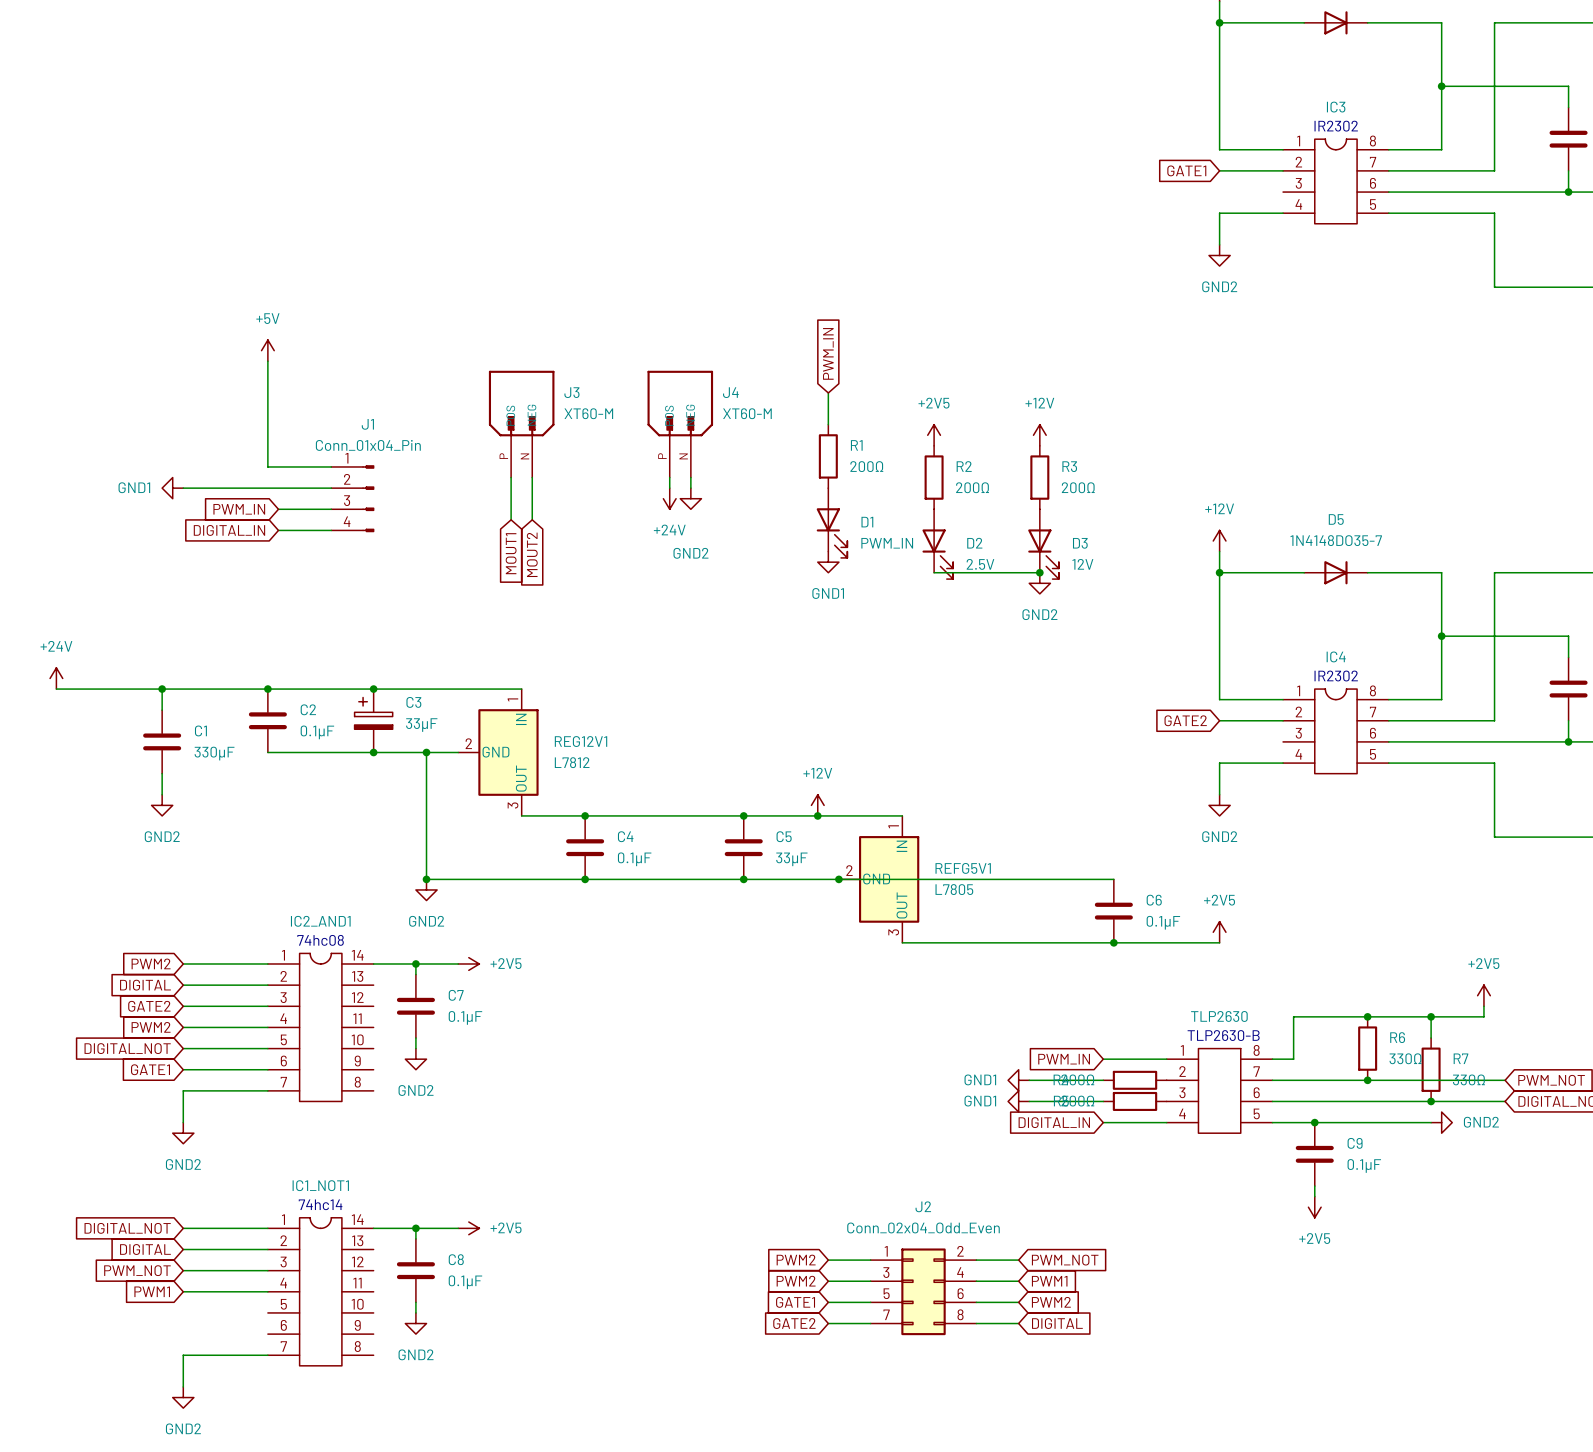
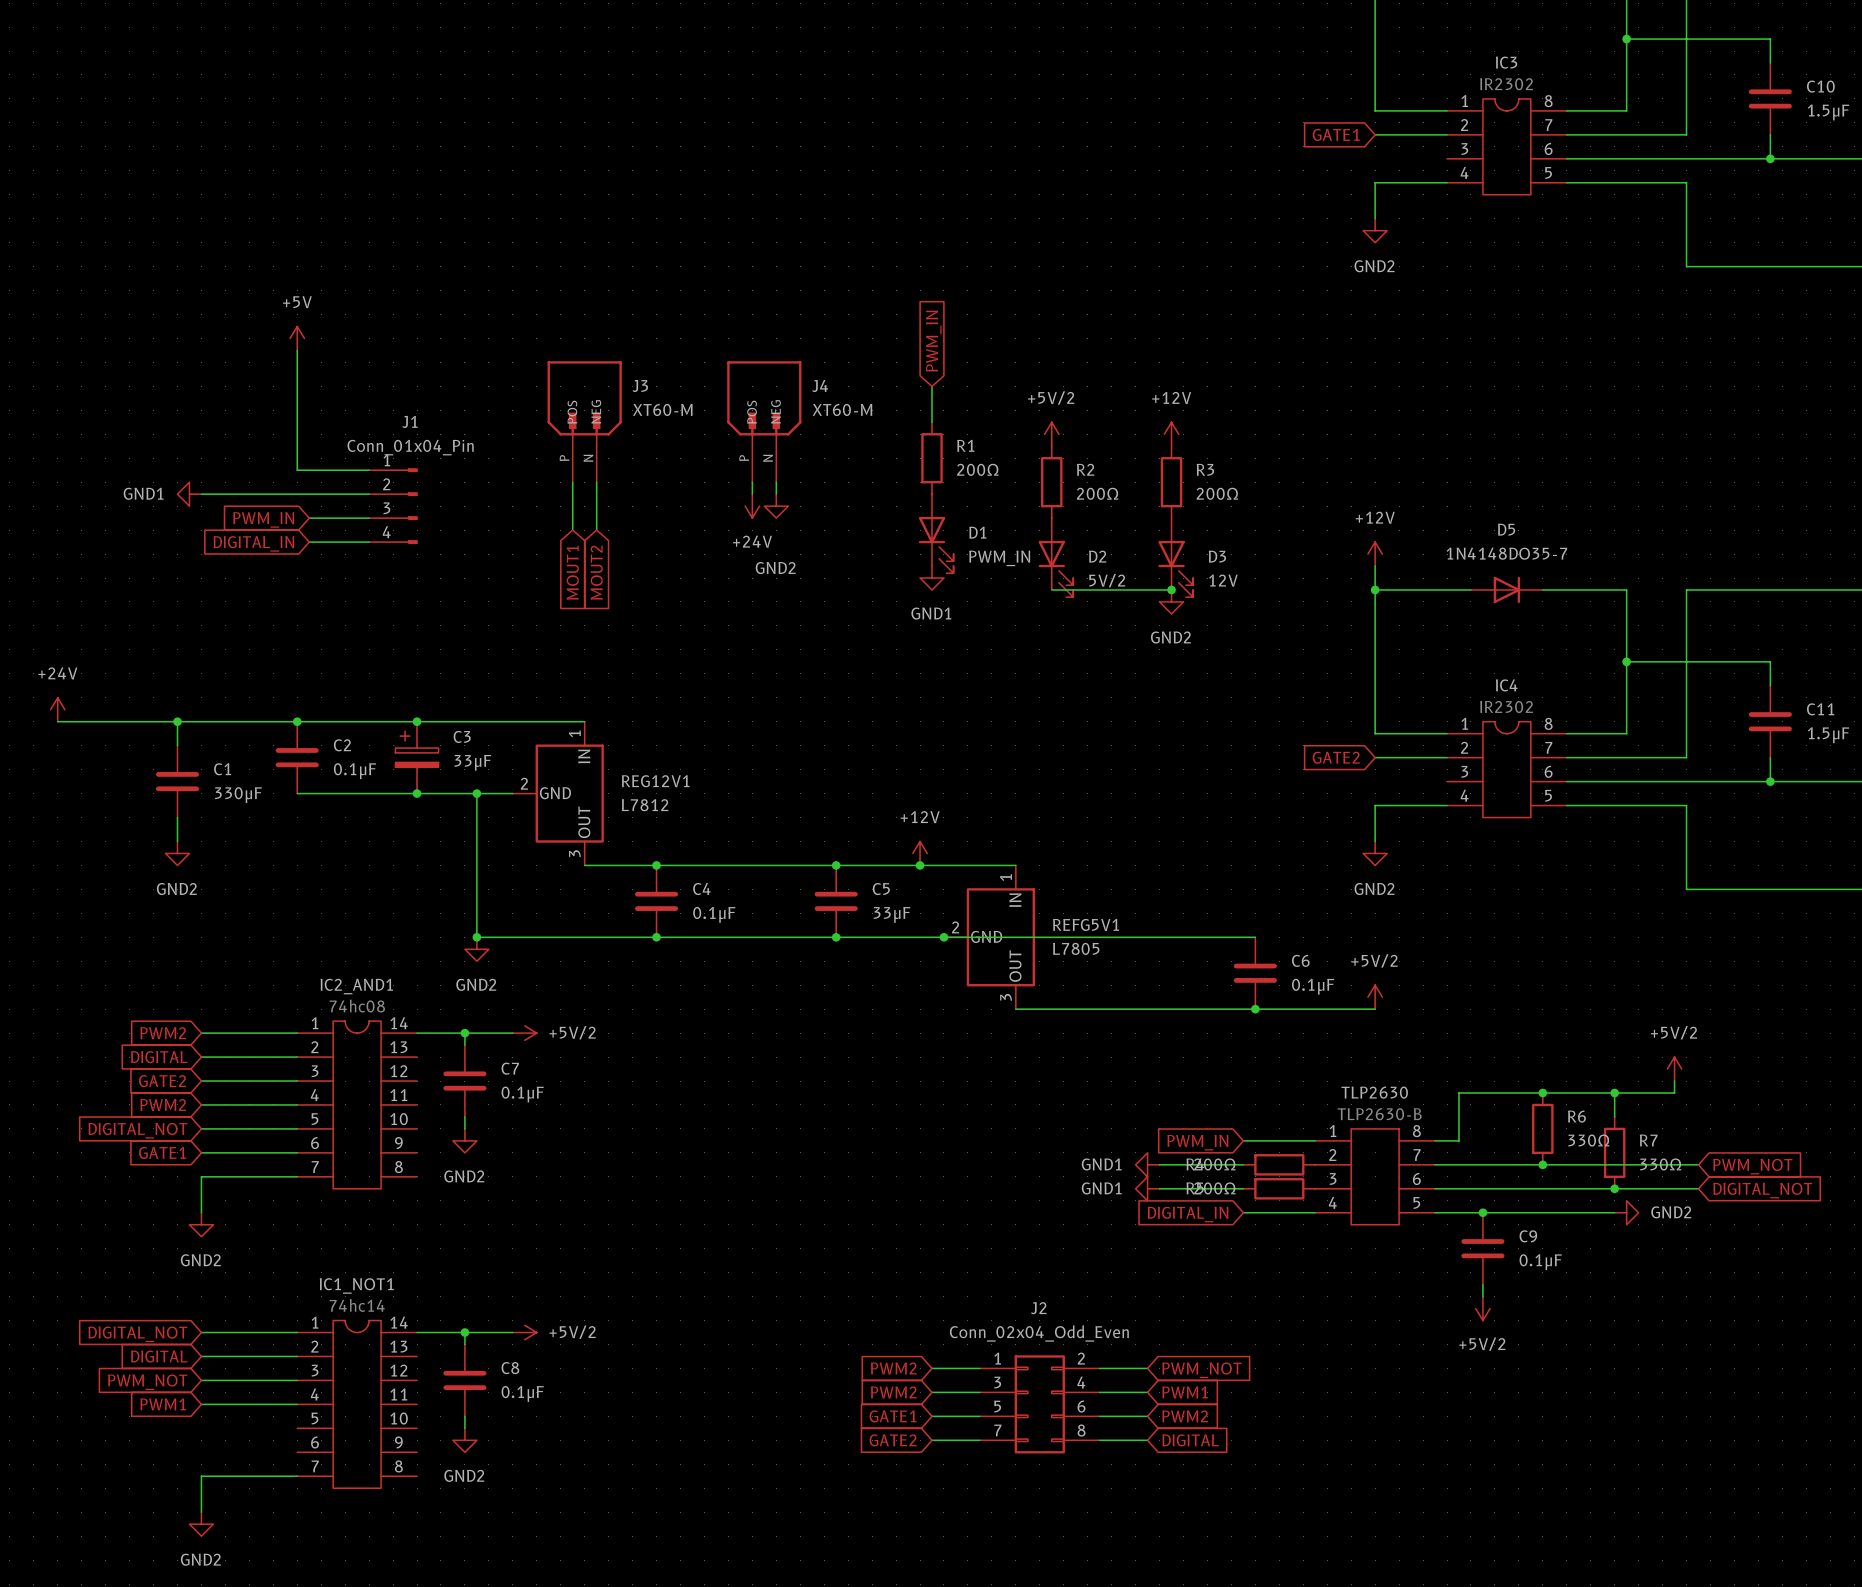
power symbol: +2V5 (934, 435) -> +5V/2 (1051, 434)
D2 value: 2.5V (980, 564) -> 5V/2 (1107, 580)
power symbol: +2V5 (1219, 932) -> +5V/2 (1375, 997)
power symbol: +2V5 (468, 963) -> +5V/2 (524, 1033)
power symbol: +2V5 (1483, 995) -> +5V/2 (1674, 1069)
power symbol: +2V5 (1314, 1207) -> +5V/2 (1482, 1308)
power symbol: +2V5 (468, 1228) -> +5V/2 (524, 1332)

